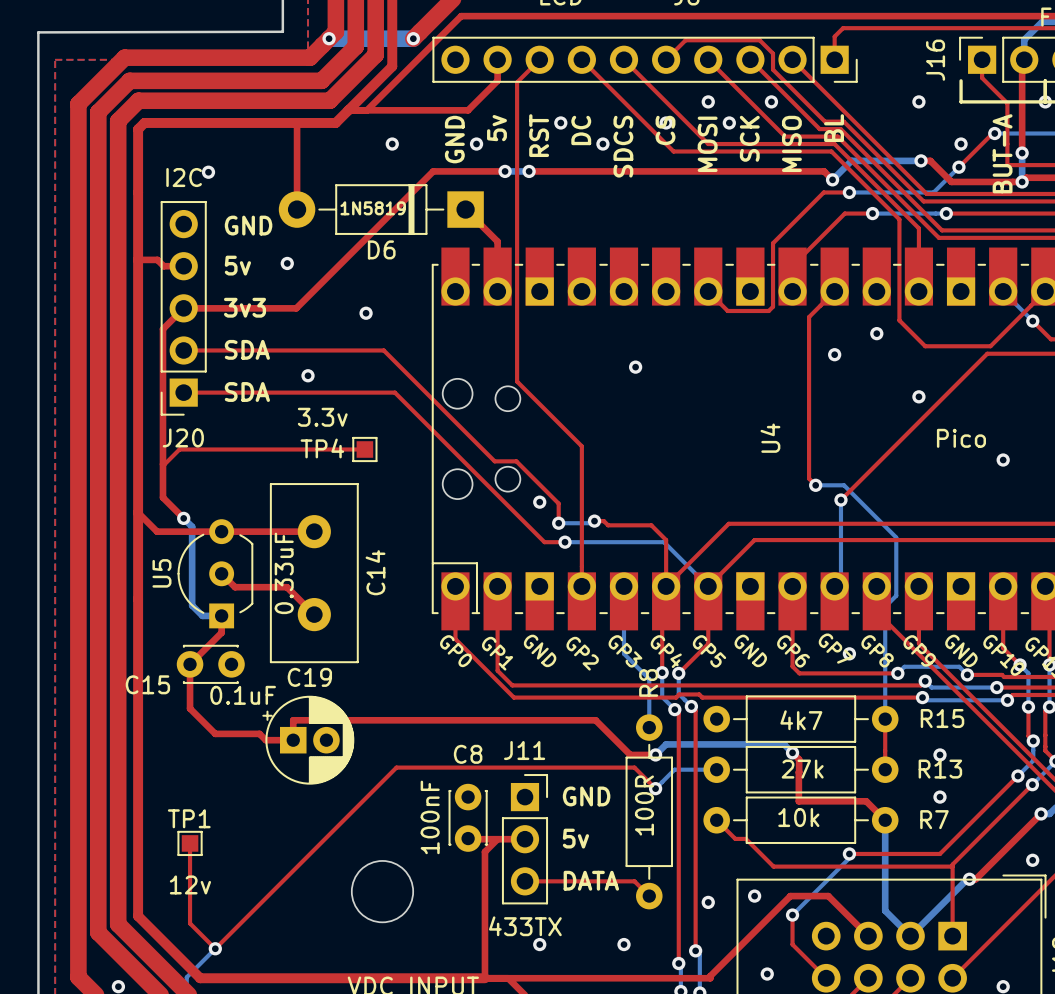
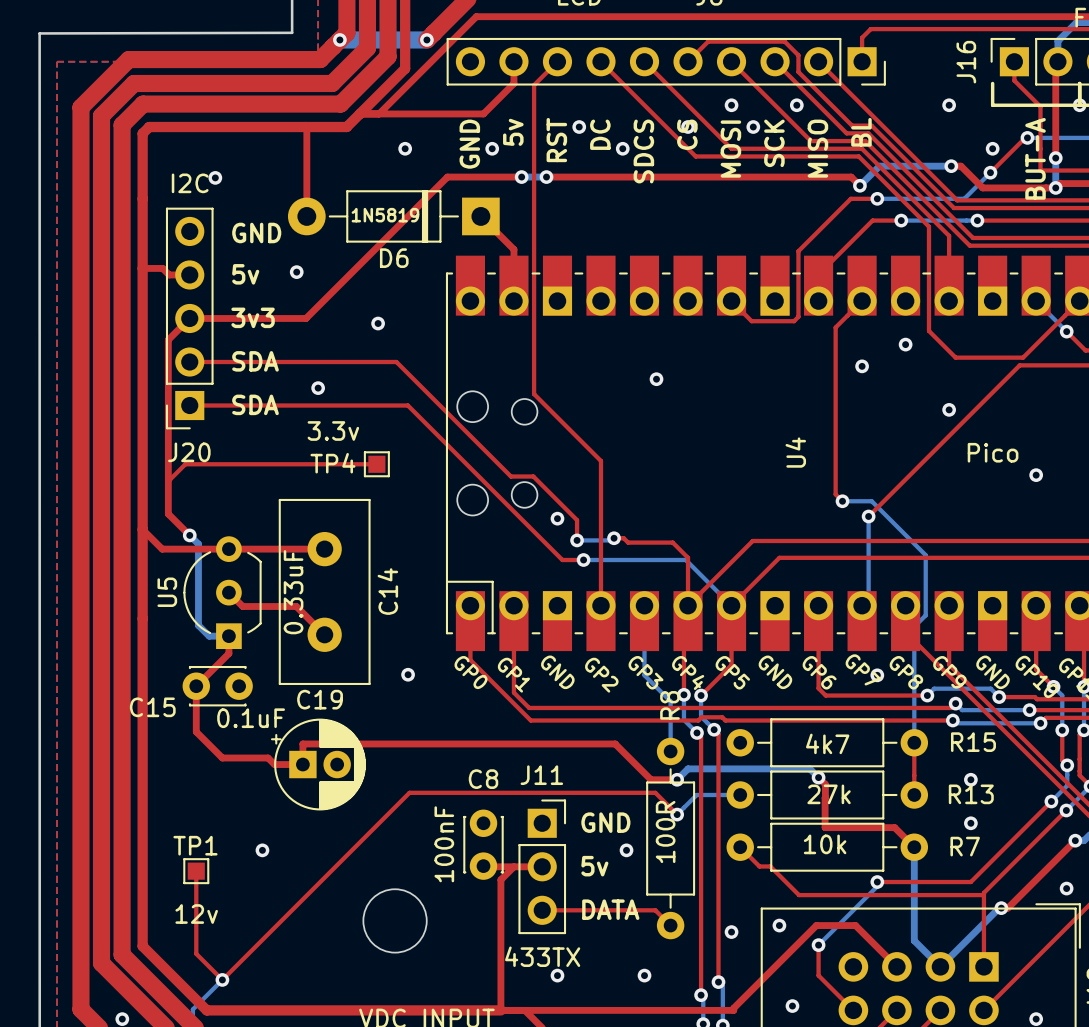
via: none -> (408, 674)
via: none -> (262, 850)
via: none -> (626, 850)

